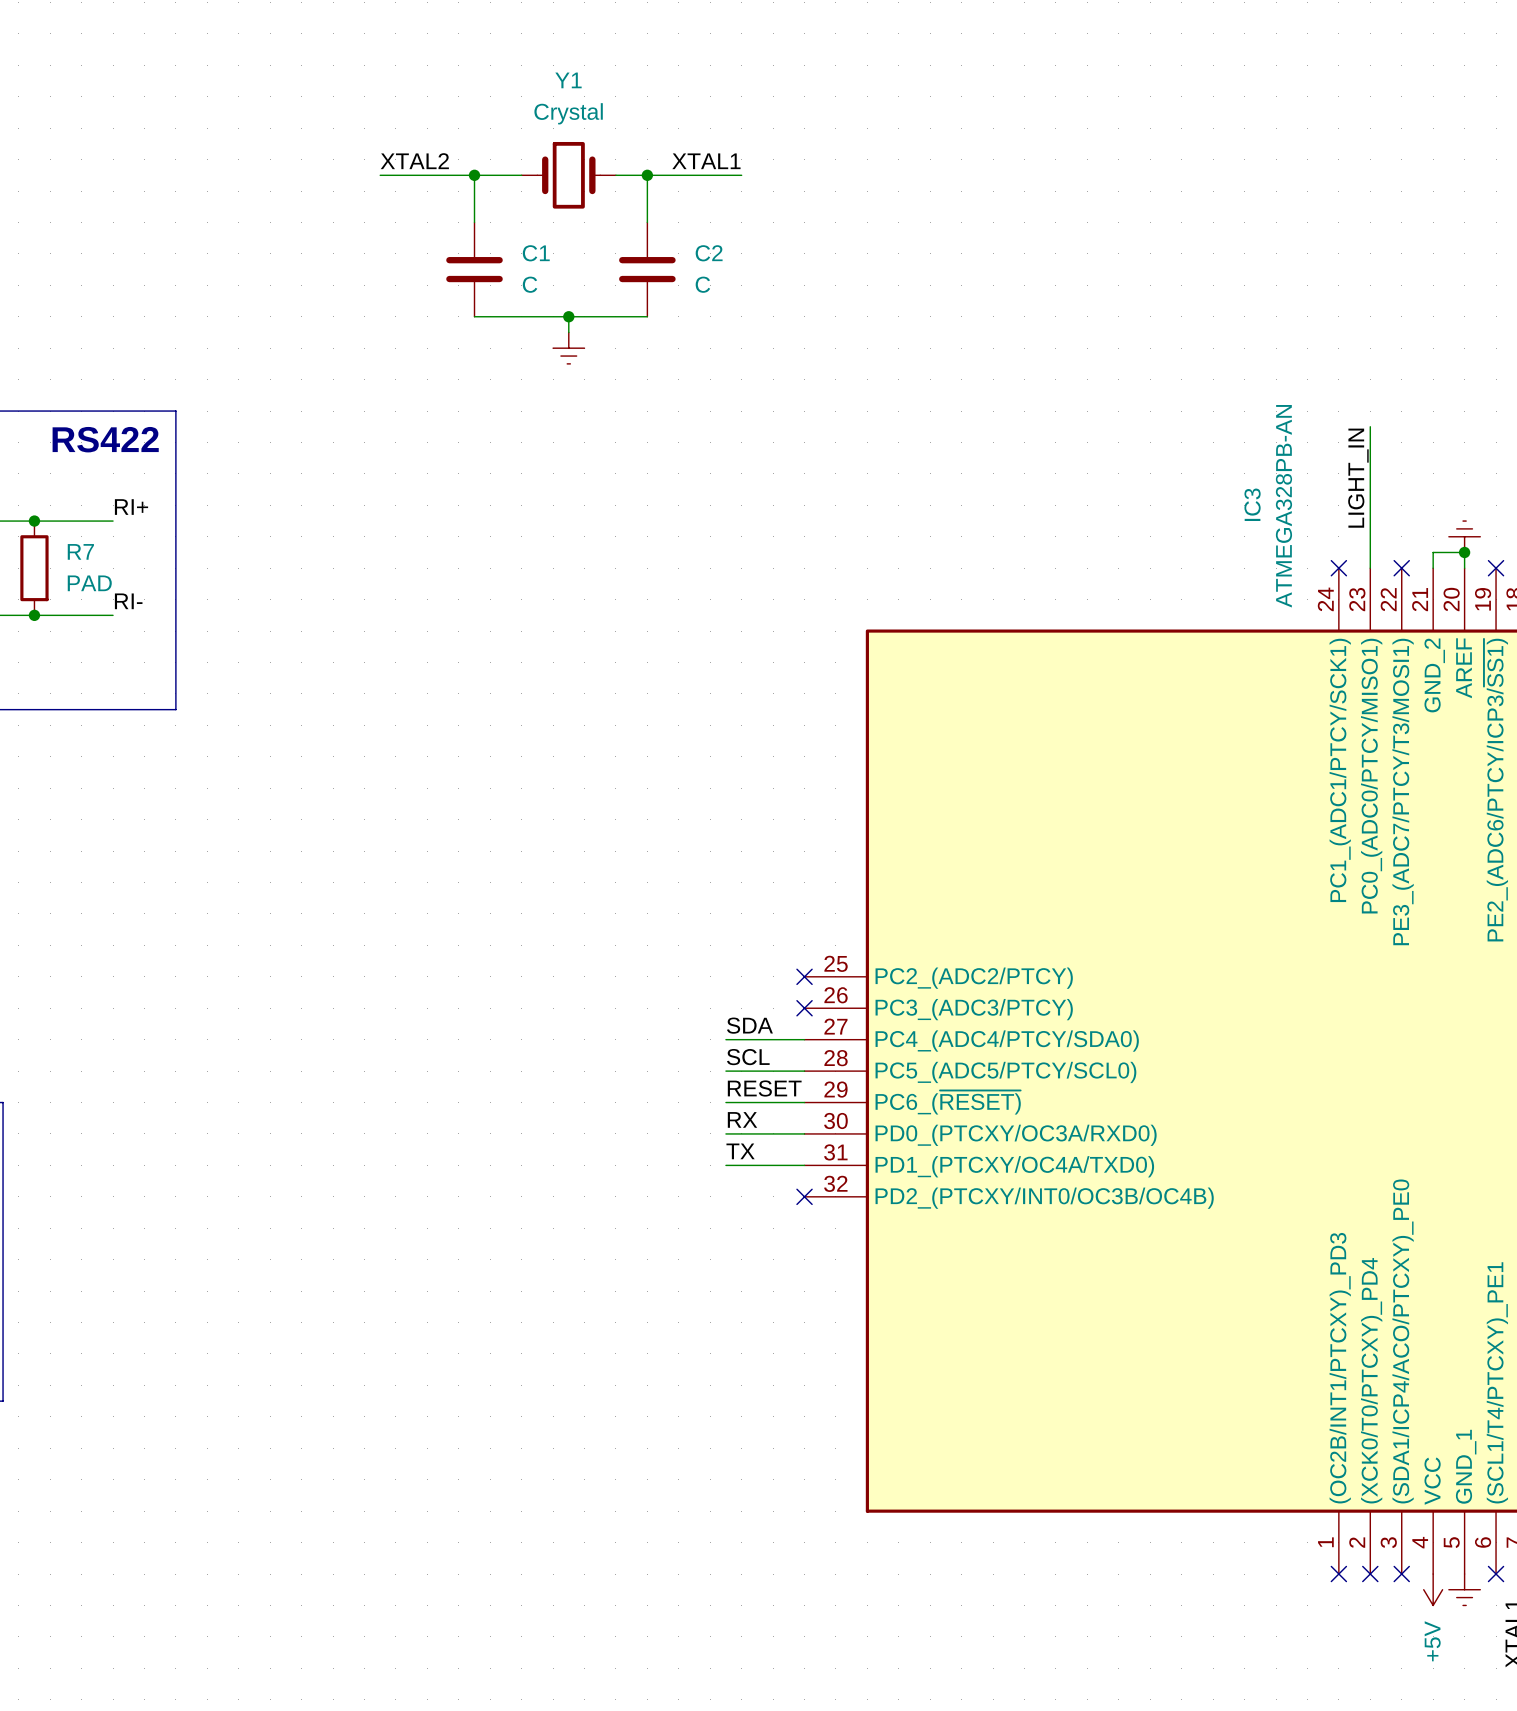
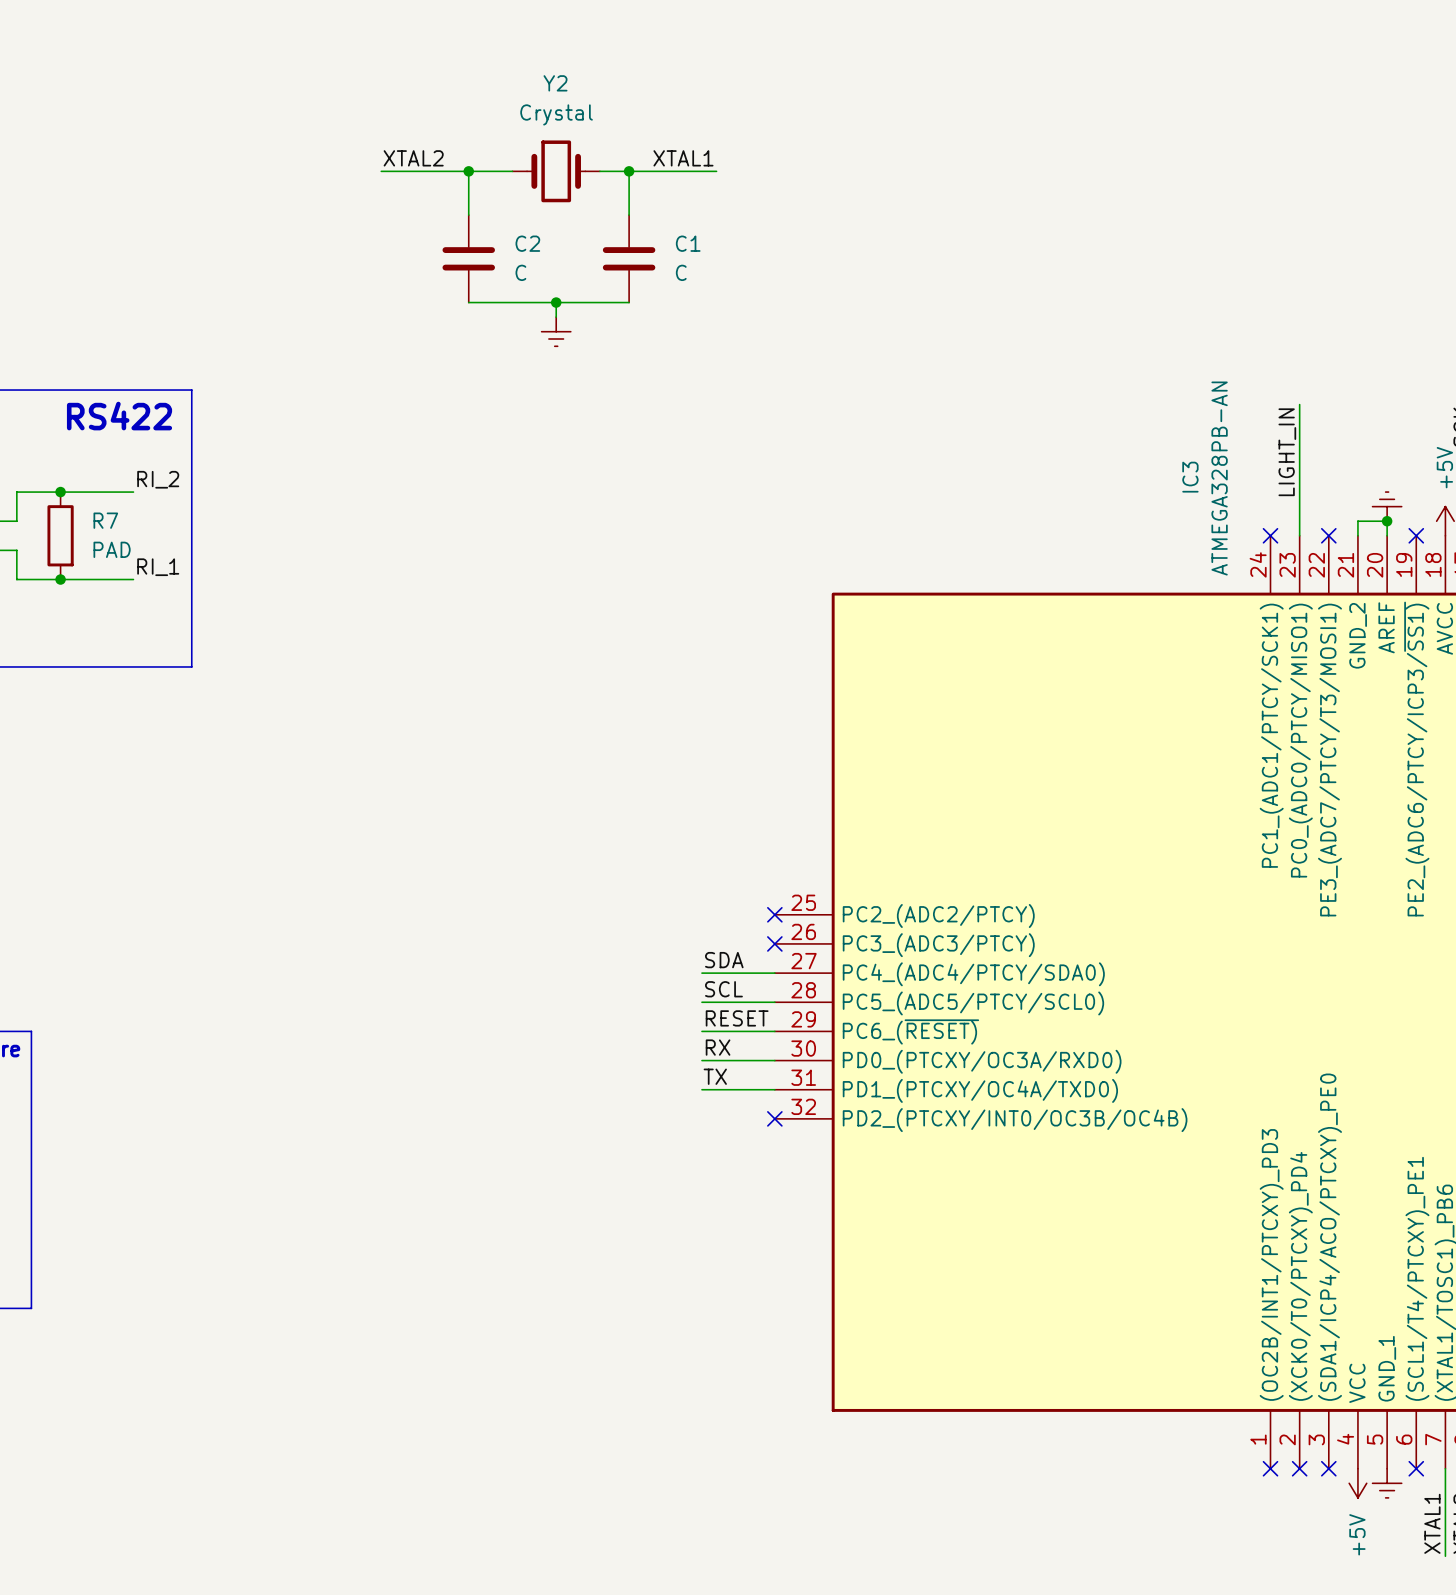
Y1 name: Y1 (568, 80) -> Y2 (555, 83)
C1 name: C1 (536, 253) -> C2 (527, 243)
C2 name: C2 (709, 253) -> C1 (688, 243)
label: RI+ (131, 507) -> RI_2 (158, 479)
label: RI- (128, 601) -> RI_1 (158, 567)

